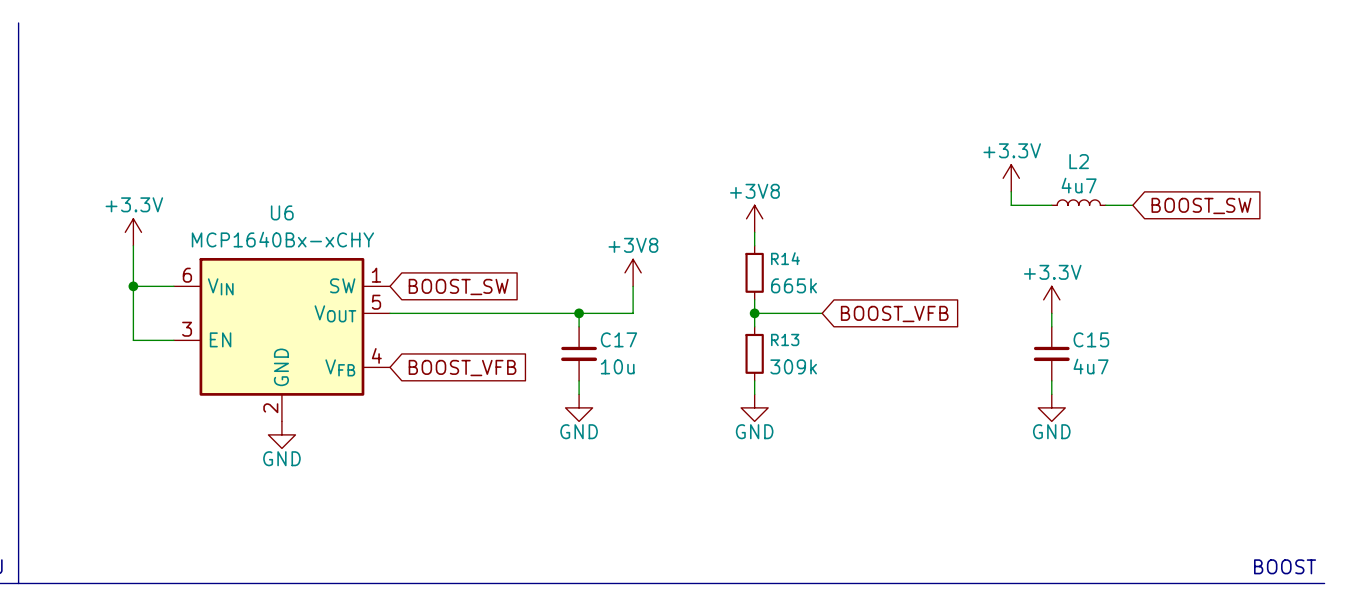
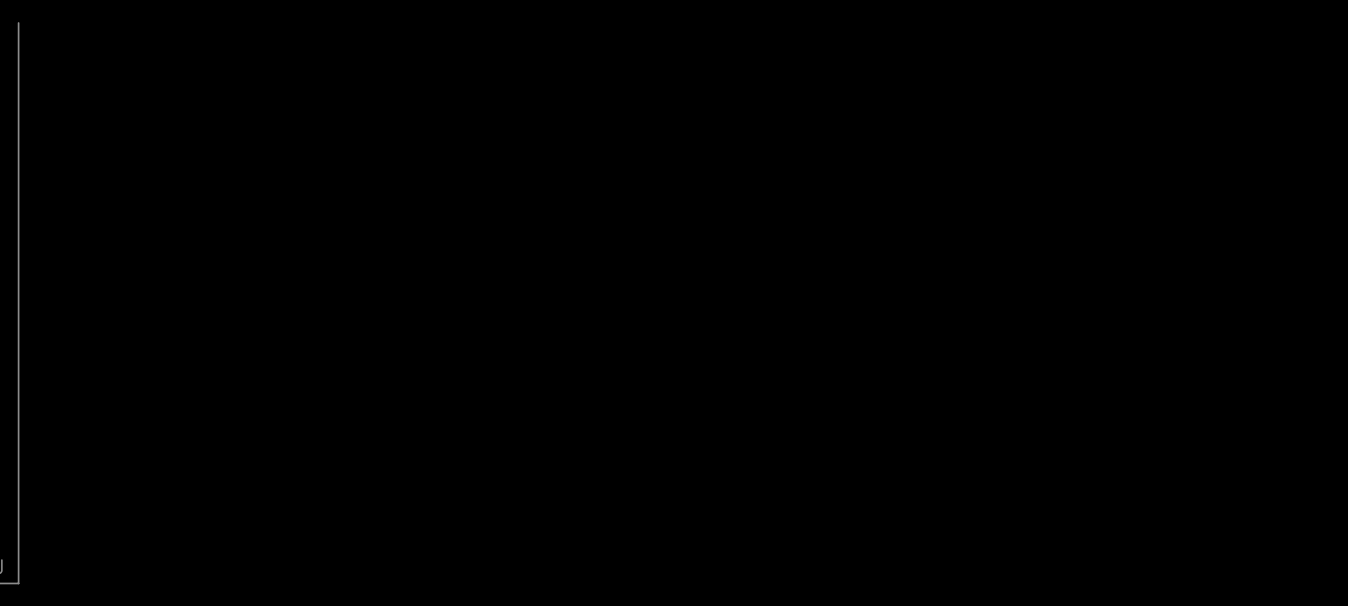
power symbol: +3.3V (1011, 178) -> none
wire: (1011, 191) (1011, 205) (1051, 205) -> none
L2: 4u7 (1078, 202) -> none
wire: (1105, 205) (1132, 205) -> none
global label: BOOST_SW (1201, 205) -> none
power symbol: +3V8 (754, 218) -> none
power symbol: +3.3V (133, 232) -> none
wire: (754, 232) (754, 245) -> none
wire: (133, 245) (133, 340) (173, 340) -> none
power symbol: +3V8 (633, 272) -> none
R14: 665k (754, 272) -> none
wire: (133, 286) (173, 286) -> none
junction: (133, 286) -> none
global label: BOOST_SW (458, 286) -> none
wire: (633, 286) (633, 313) (389, 313) -> none
wire: (754, 299) (754, 326) -> none
power symbol: +3.3V (1051, 299) -> none
wire: (579, 313) (579, 326) -> none
junction: (579, 313) -> none
wire: (754, 313) (822, 313) -> none
junction: (754, 313) -> none
wire: (1051, 313) (1051, 326) -> none
global label: BOOST_VFB (894, 314) -> none
U6: MCP1640Bx-xCHY (281, 339) -> none
C17: 10u (579, 353) -> none
R13: 309k (754, 353) -> none
C15: 4u7 (1051, 353) -> none
global label: BOOST_VFB (462, 368) -> none
wire: (579, 380) (579, 394) -> none
wire: (754, 380) (754, 394) -> none
wire: (1051, 380) (1051, 394) -> none
power symbol: GND (579, 407) -> none
power symbol: GND (754, 407) -> none
power symbol: GND (1051, 407) -> none
power symbol: GND (281, 434) -> none
text: BOOST (1285, 566) -> none
line: (18, 583) (1324, 583) -> none

